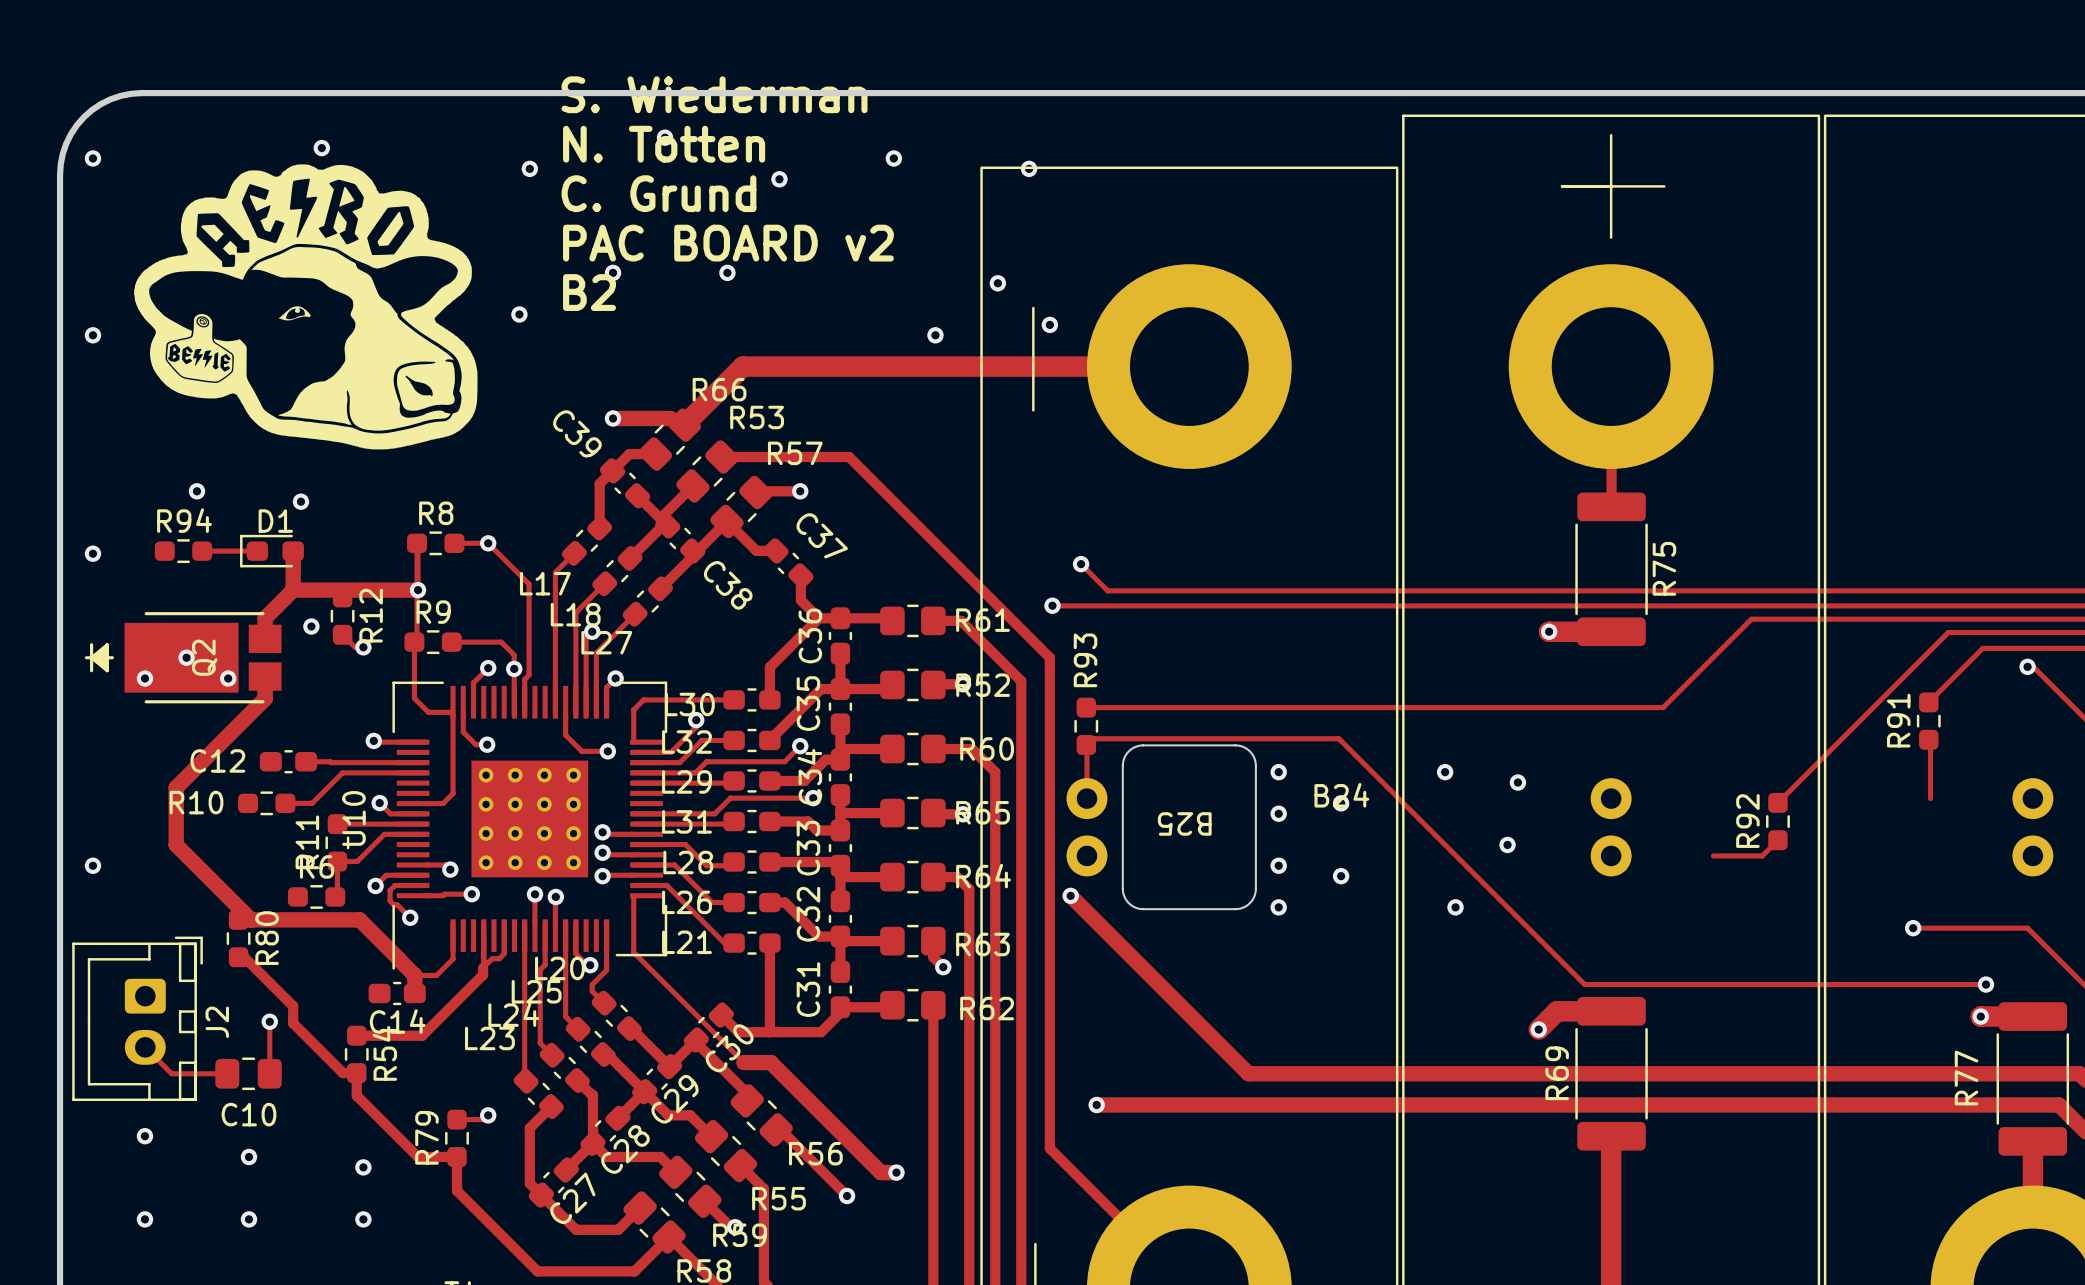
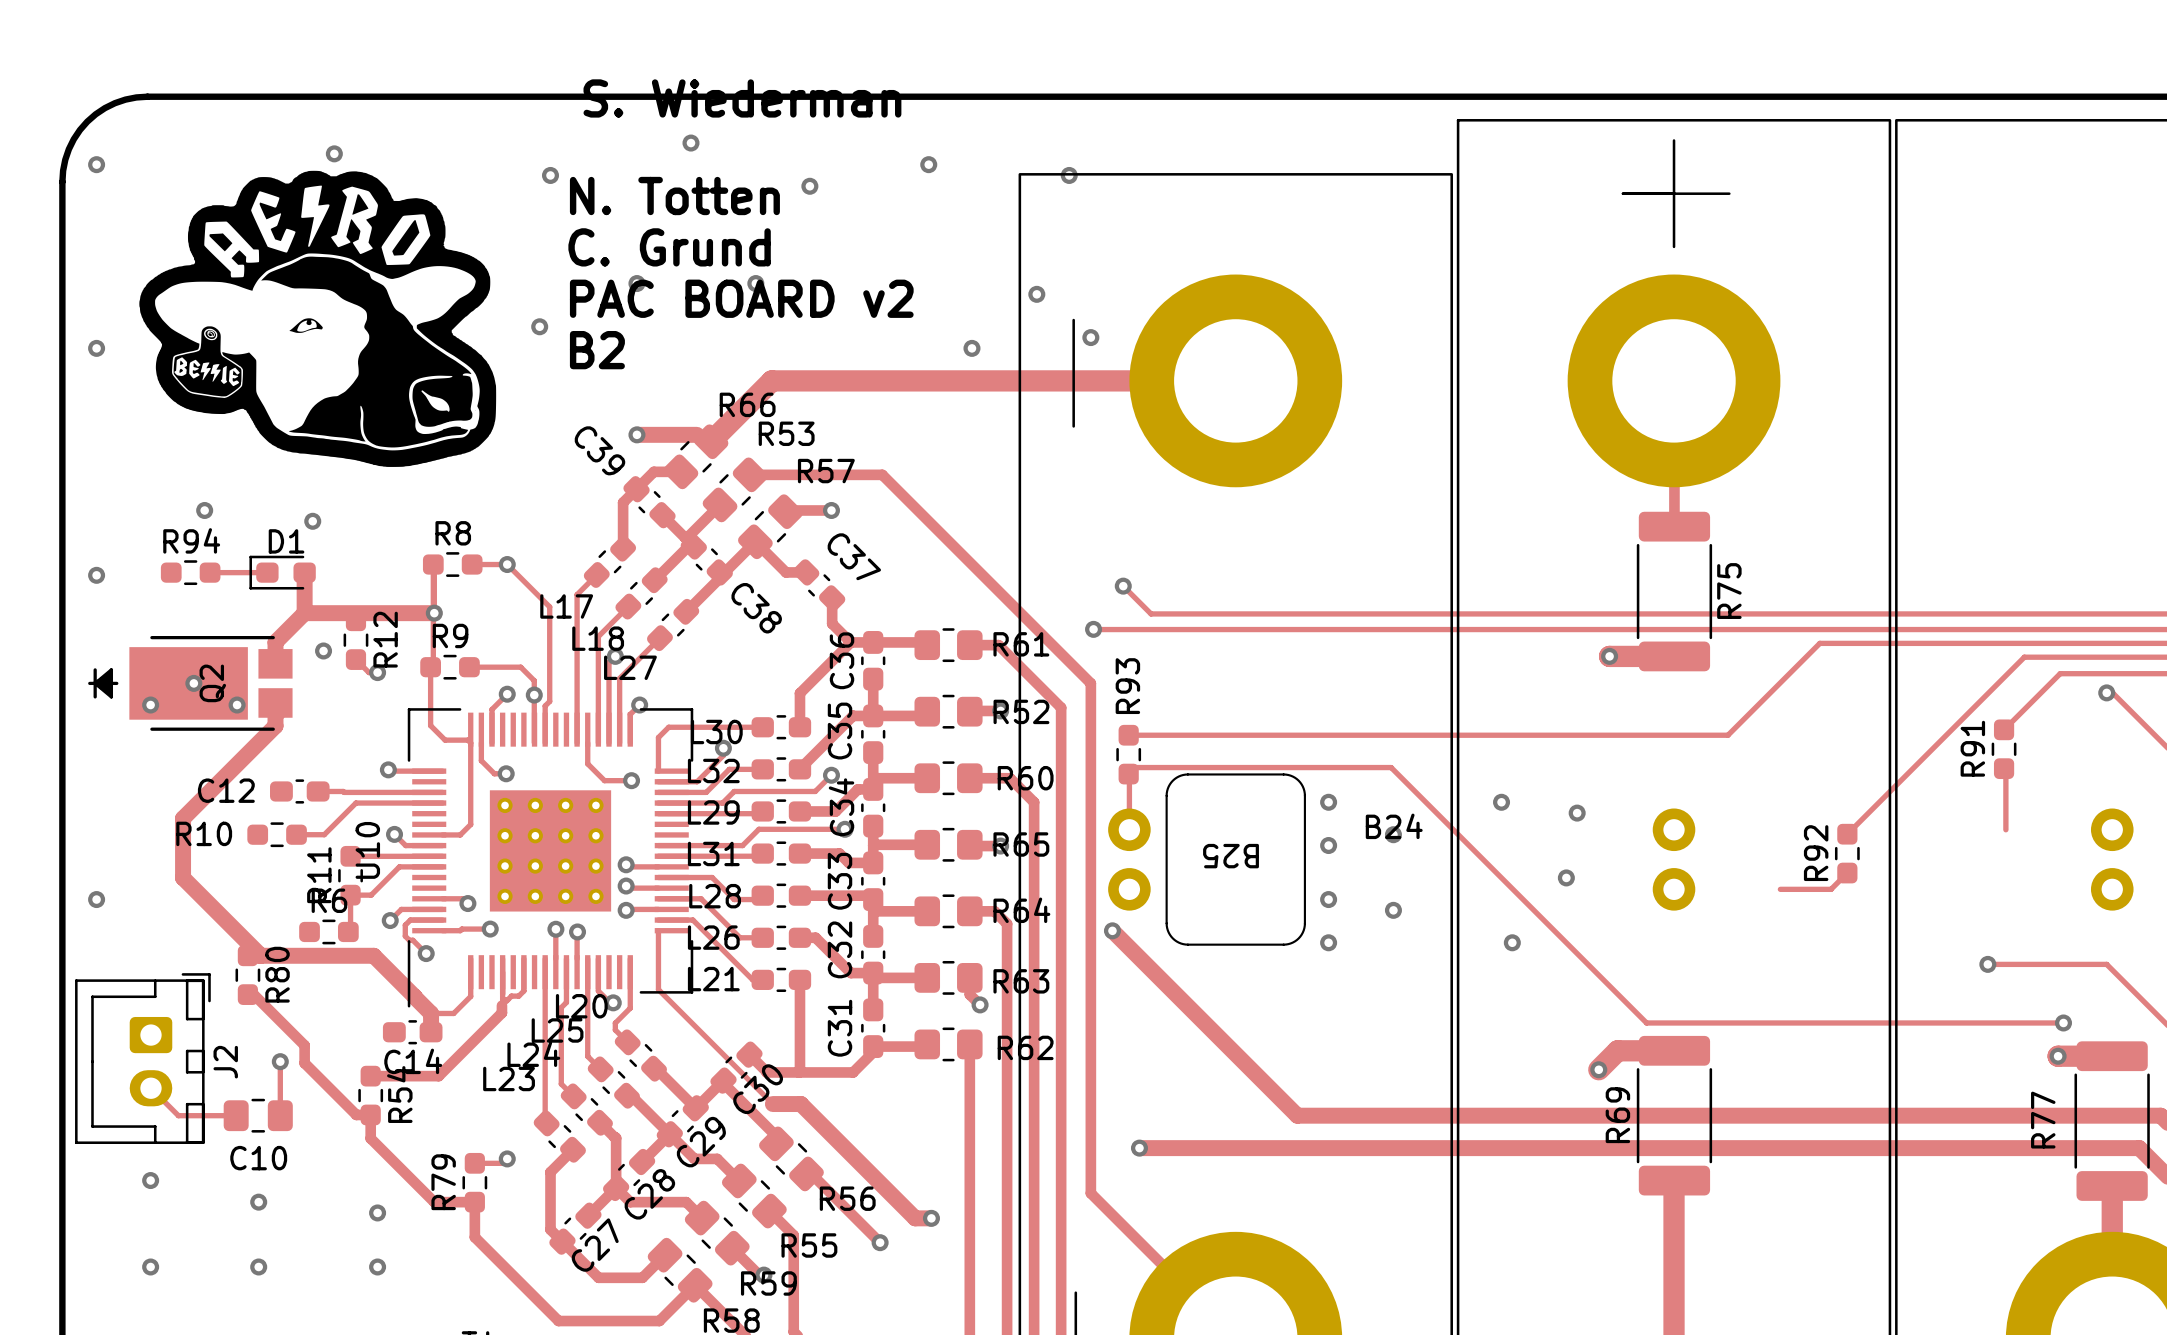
text position: N. Totten (664, 144) -> N. Totten (674, 196)
text position: C. Grund (658, 193) -> C. Grund (669, 247)
text position: PAC BOARD v2 (728, 243) -> PAC BOARD v2 (741, 298)
text position: B2 (589, 292) -> B2 (597, 350)

